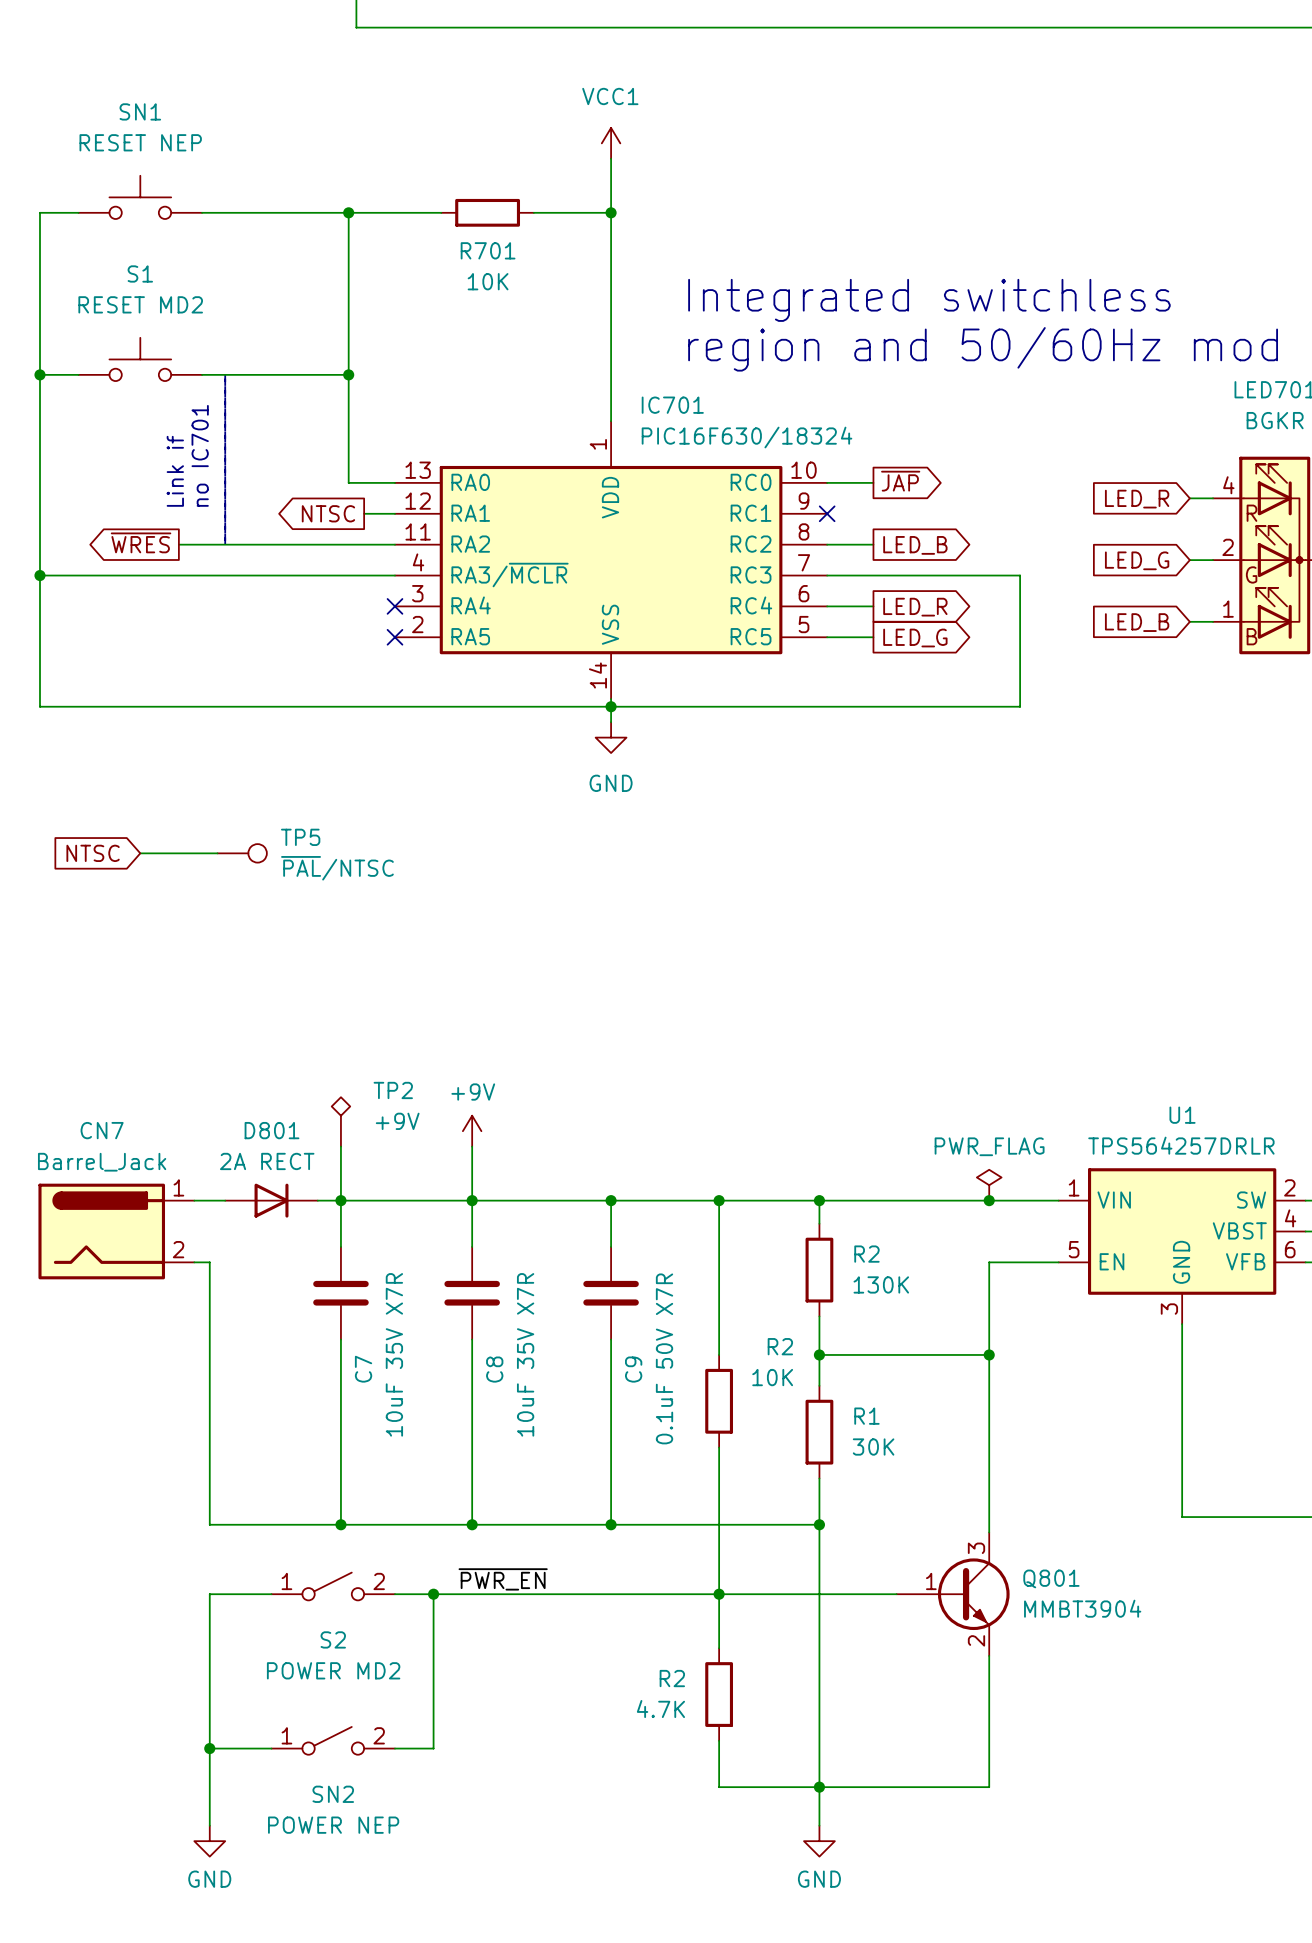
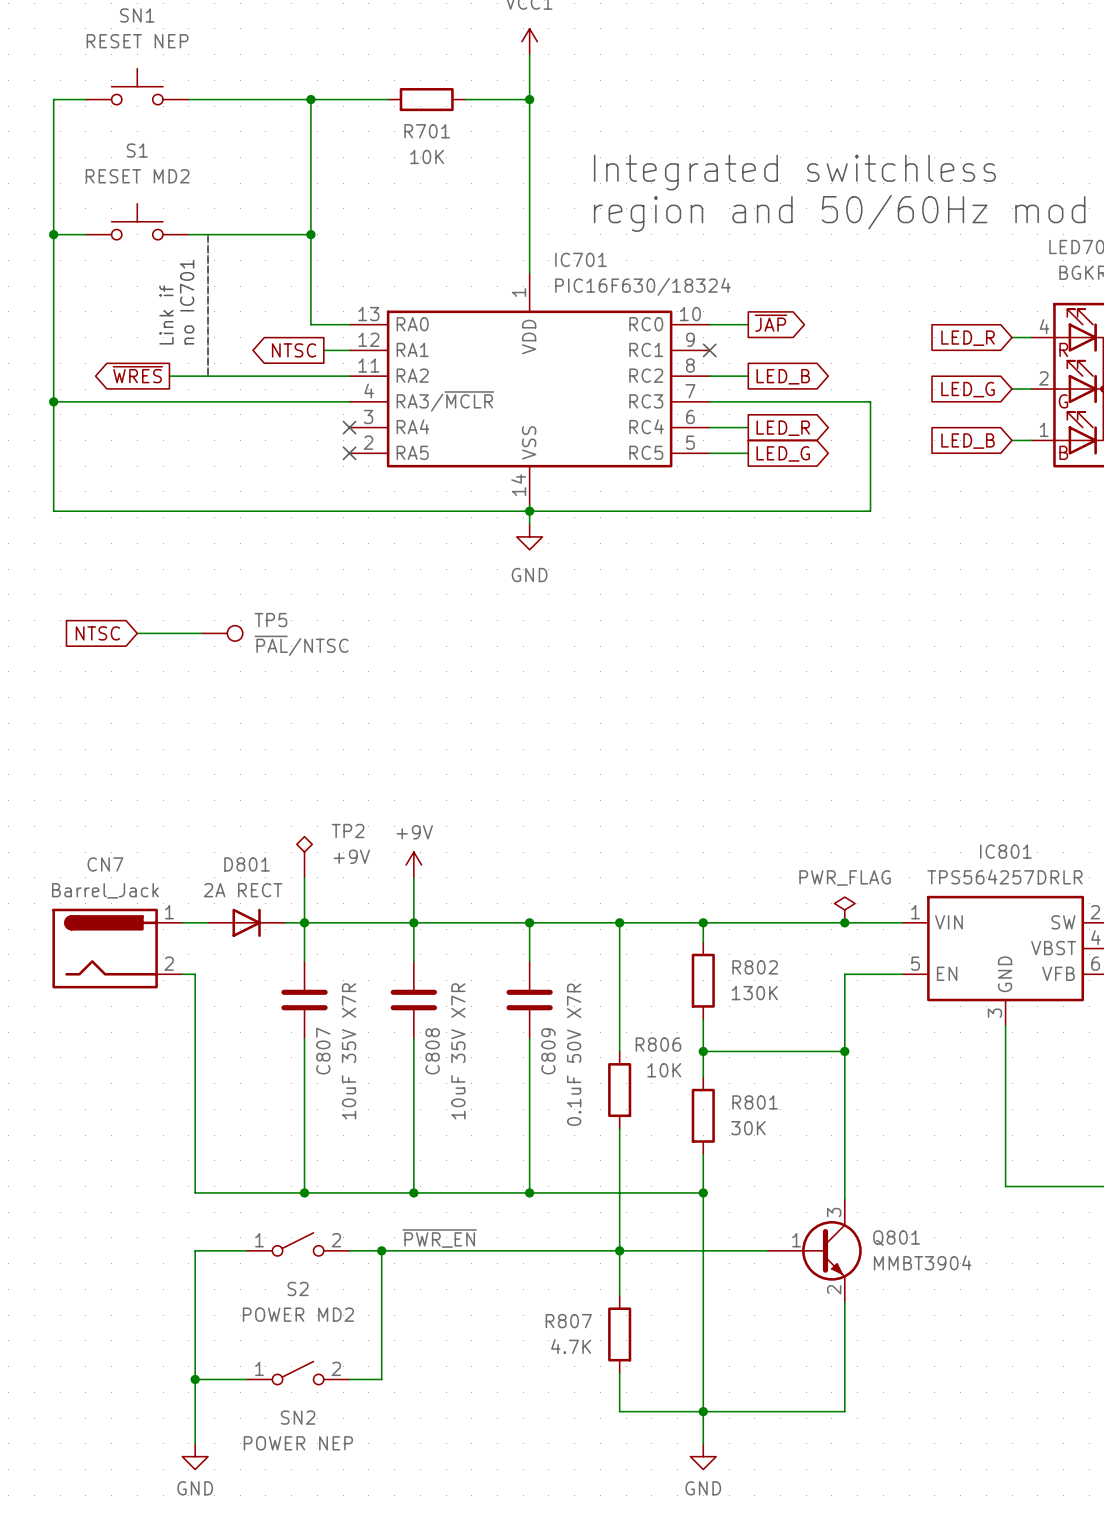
U1 name: U1 (1182, 1115) -> IC801 (1005, 851)
R2 name: R2 (866, 1254) -> R802 (755, 967)
R2 name: R2 (780, 1346) -> R806 (658, 1044)
C7 name: C7 (363, 1369) -> C807 (323, 1051)
C8 name: C8 (494, 1369) -> C808 (432, 1051)
C9 name: C9 (633, 1369) -> C809 (548, 1051)
R1 name: R1 (866, 1416) -> R801 (755, 1102)
R2 name: R2 (672, 1678) -> R807 (568, 1321)

